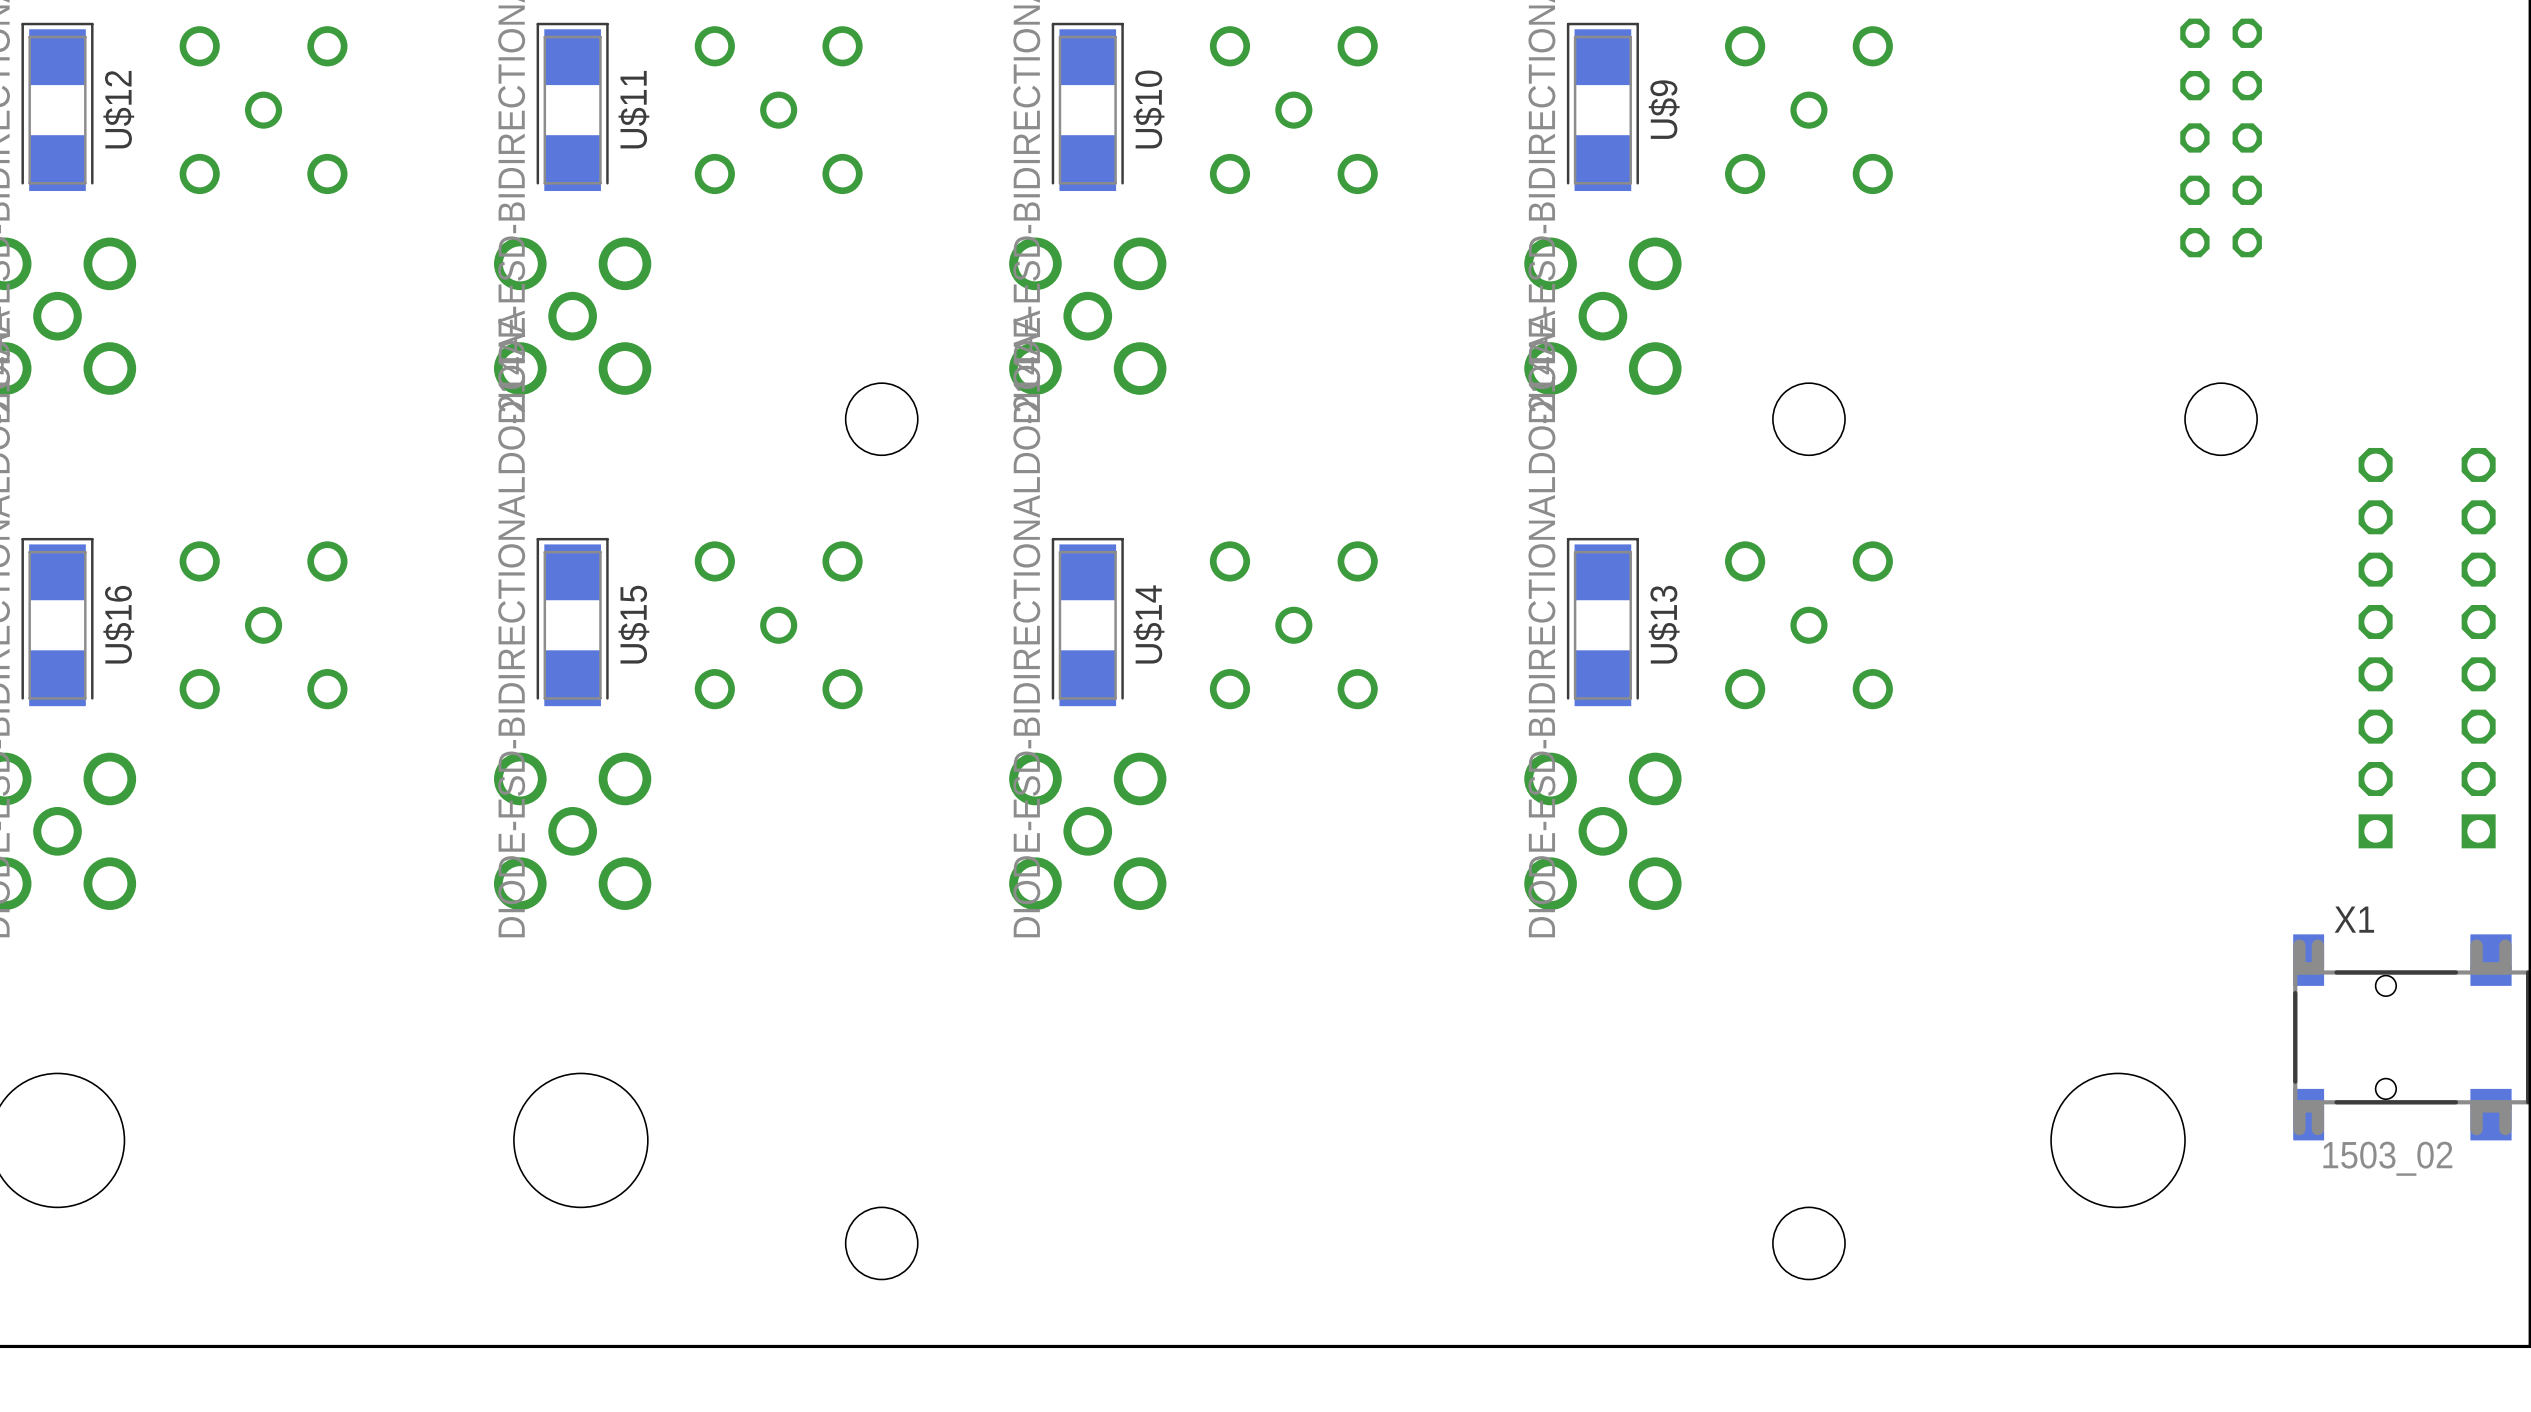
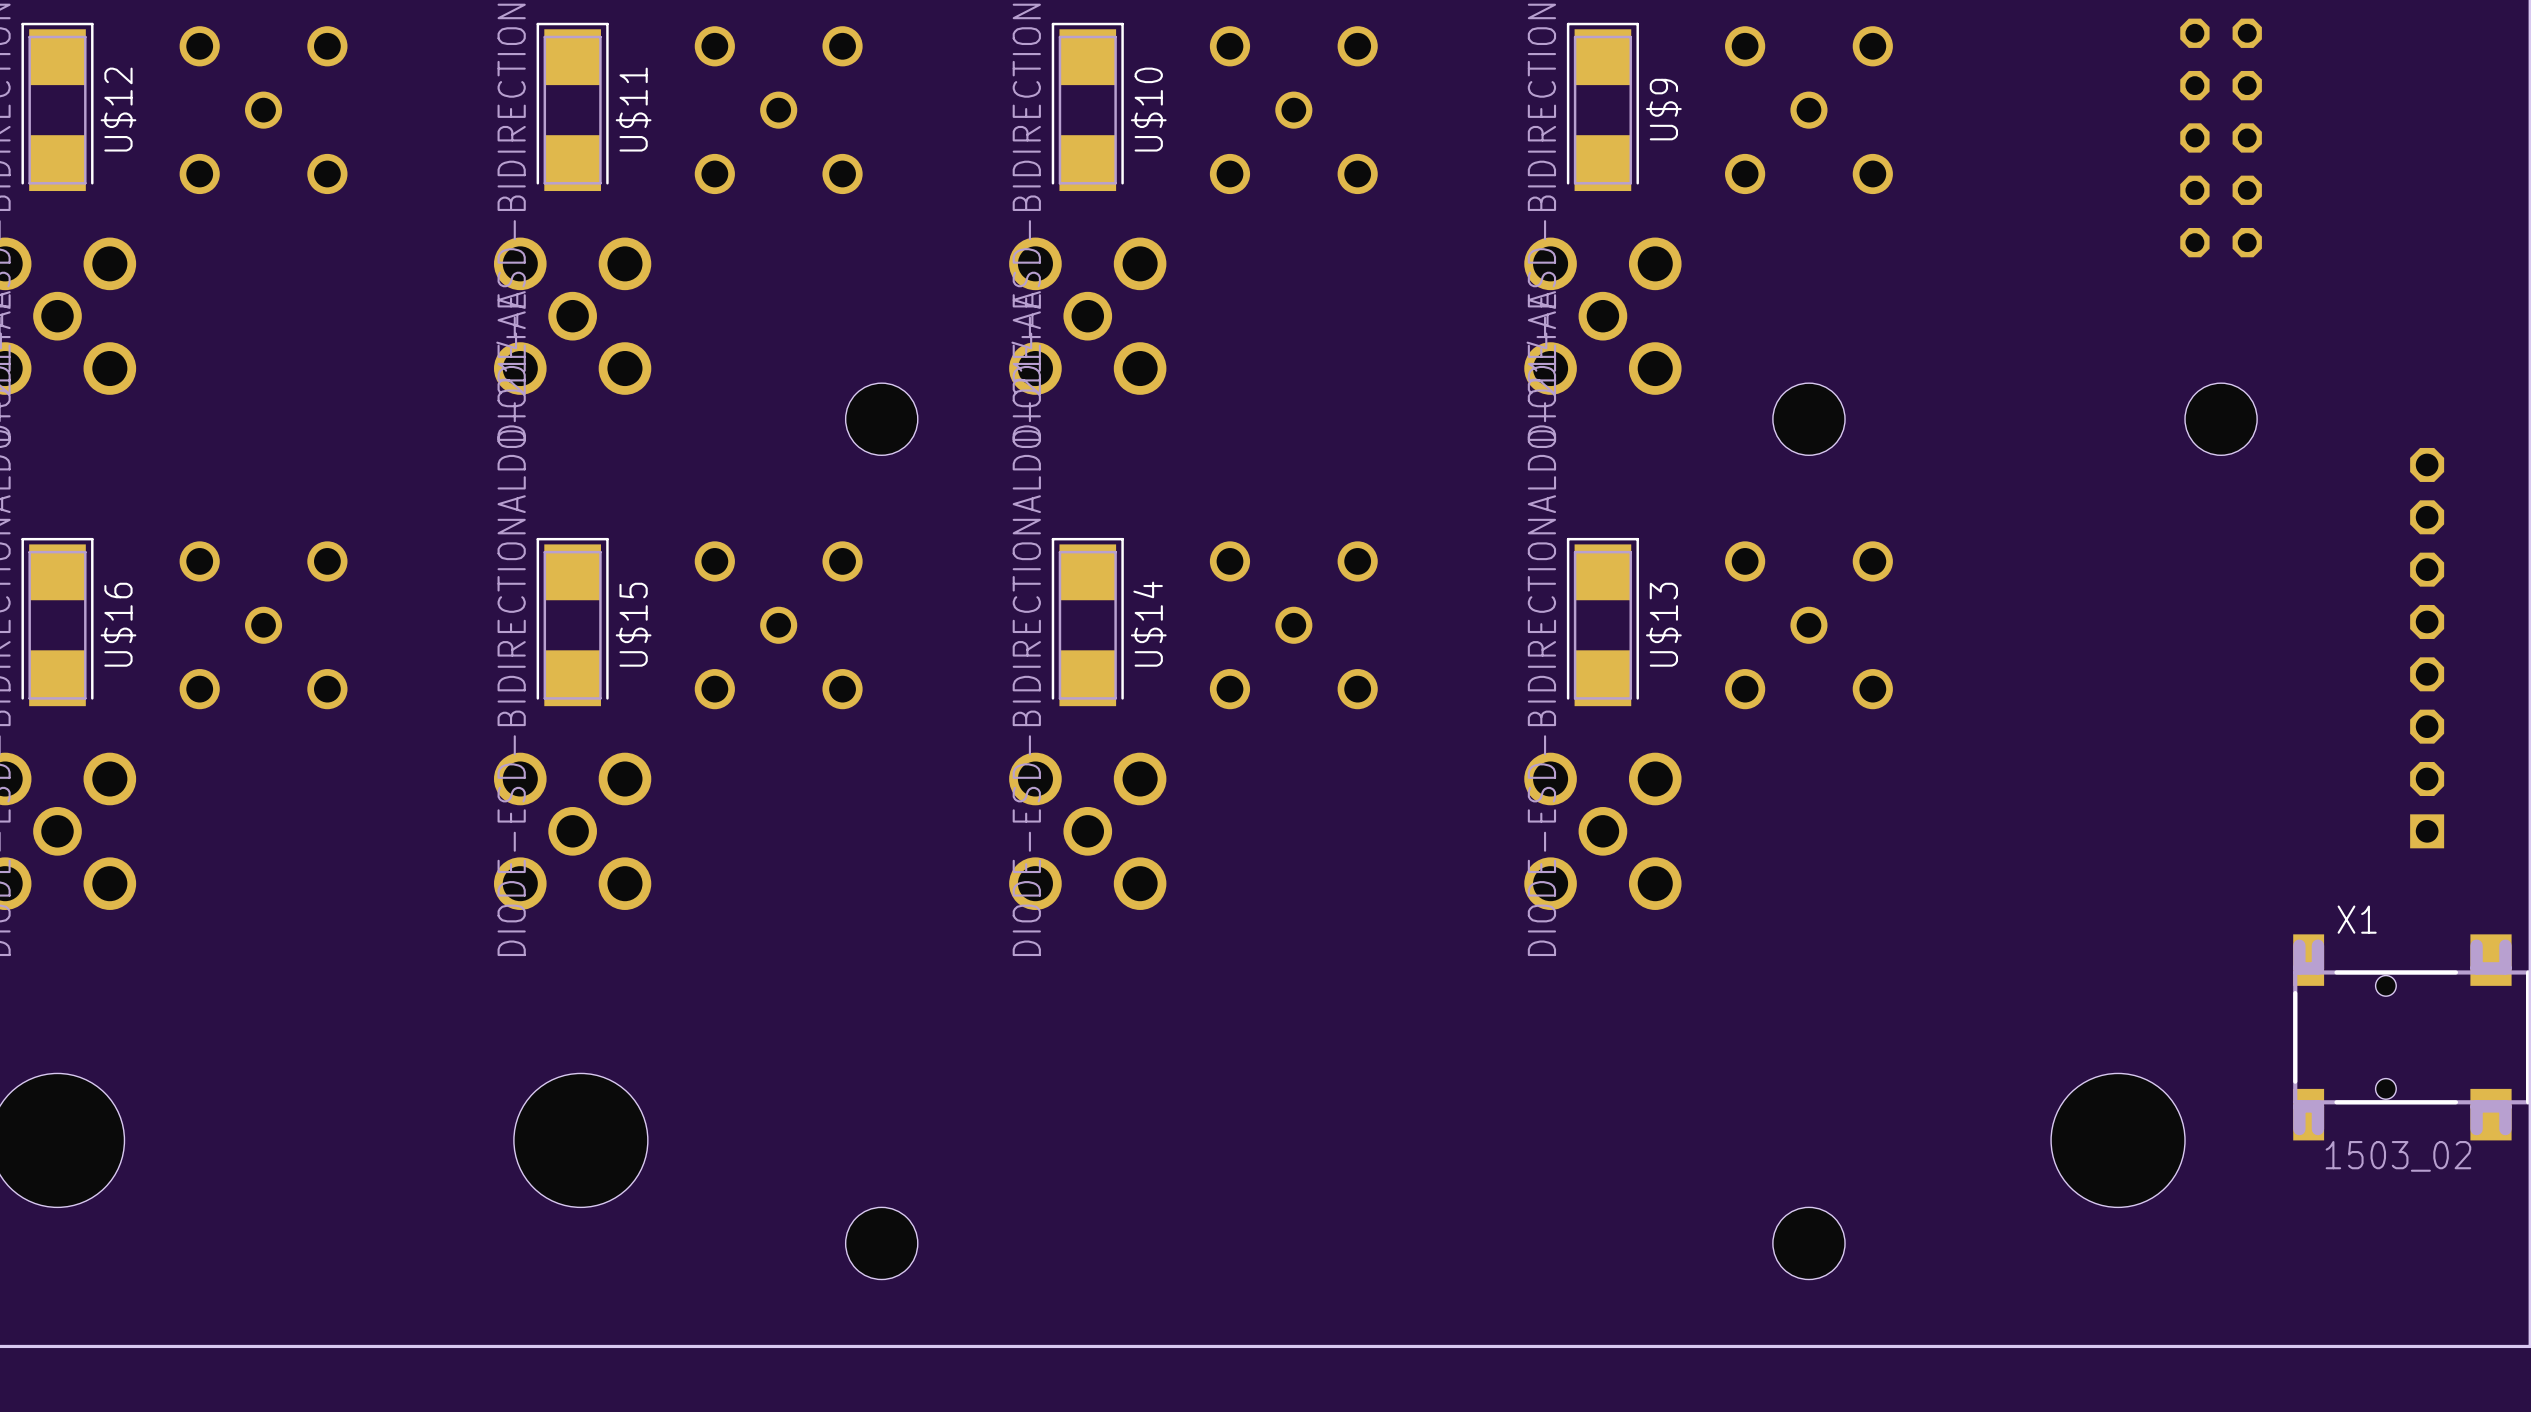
part: (2375, 648) -> none
part: none -> (2427, 648)
part: (2478, 648) -> none

